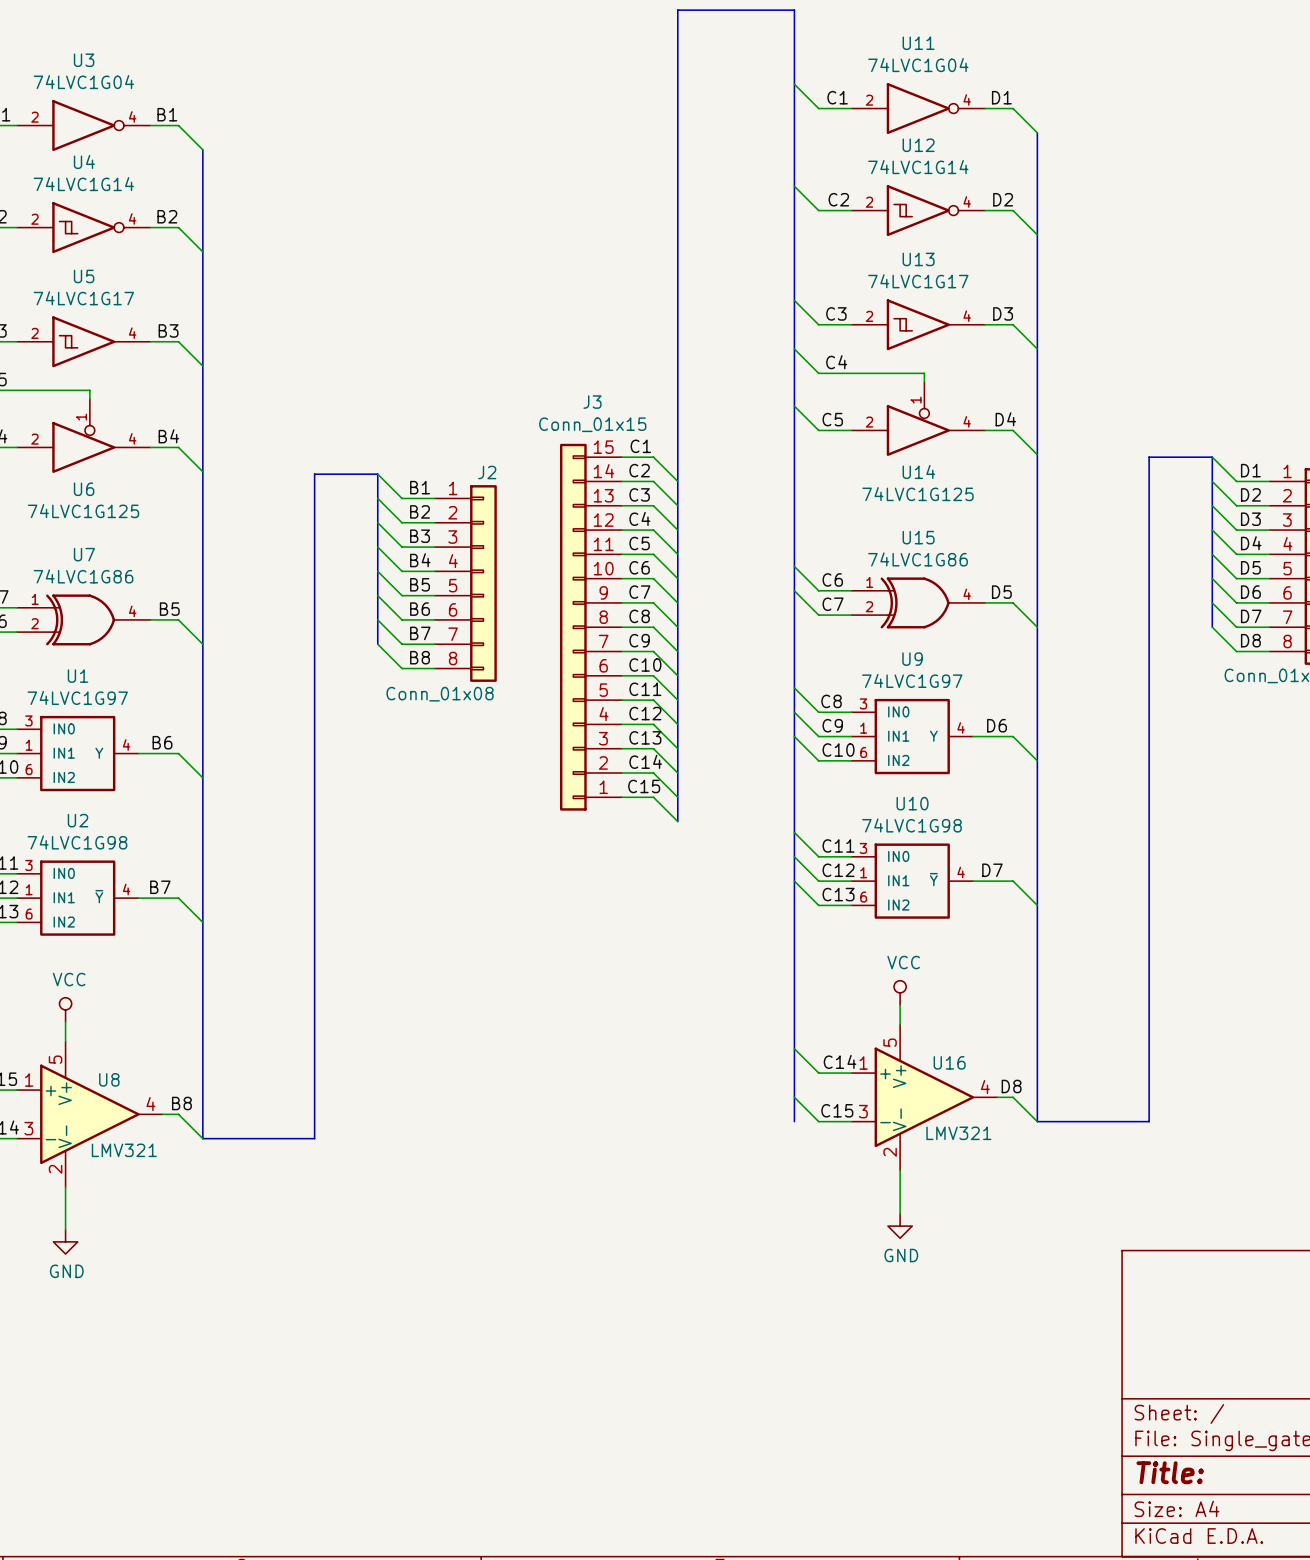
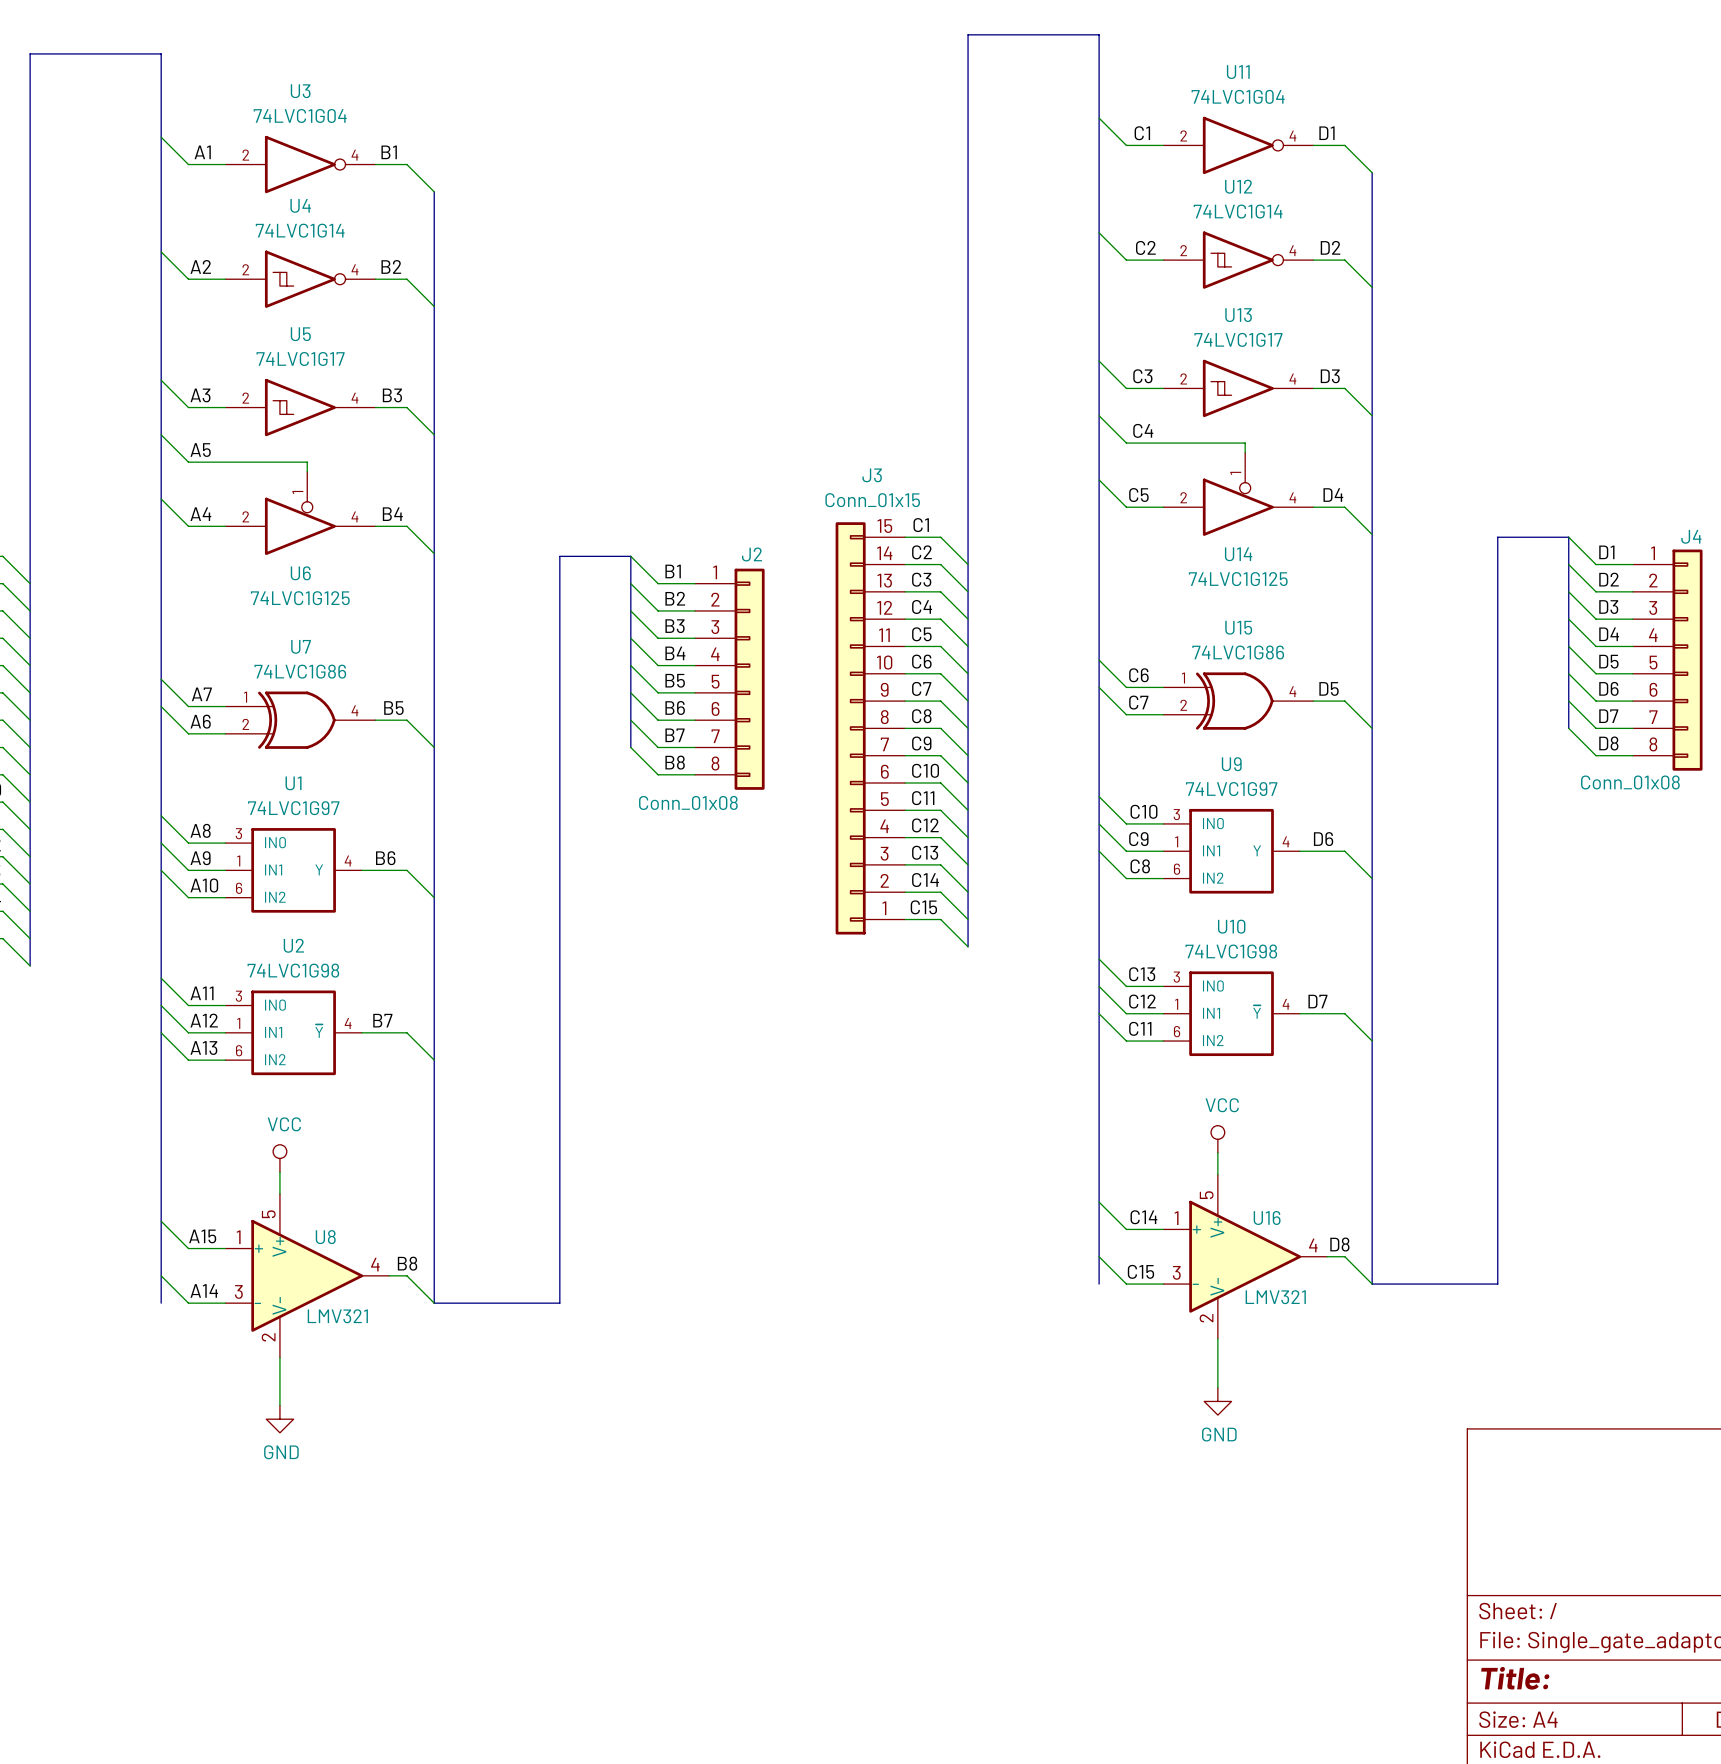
label: C8 (831, 701) -> C10 (1143, 811)
label: C10 (838, 750) -> C8 (1140, 866)
label: C11 (838, 845) -> C13 (1142, 974)
label: C13 (838, 894) -> C11 (1140, 1028)

